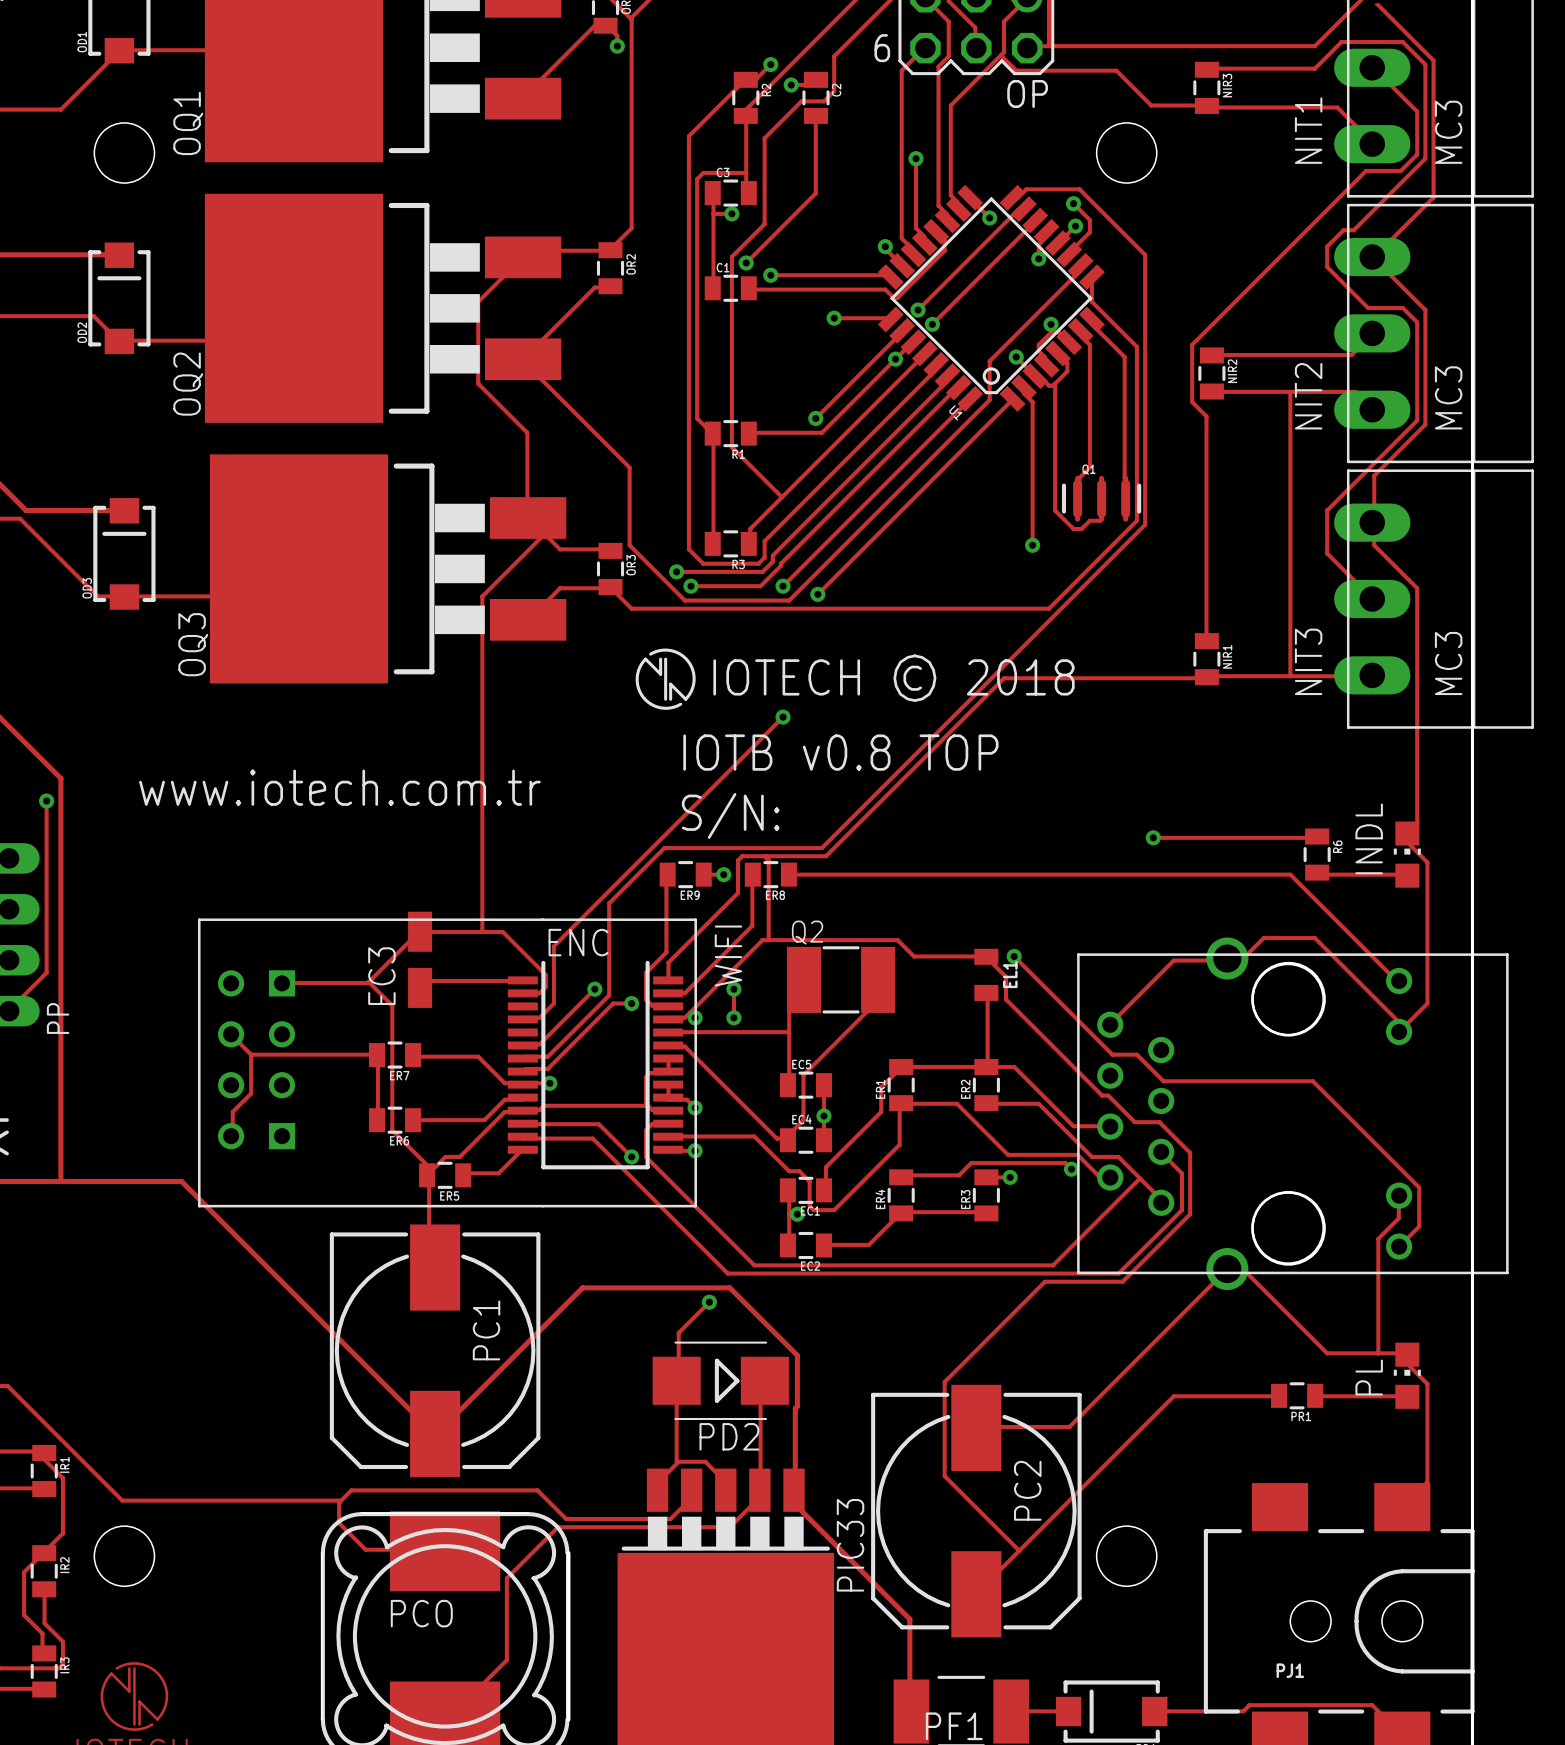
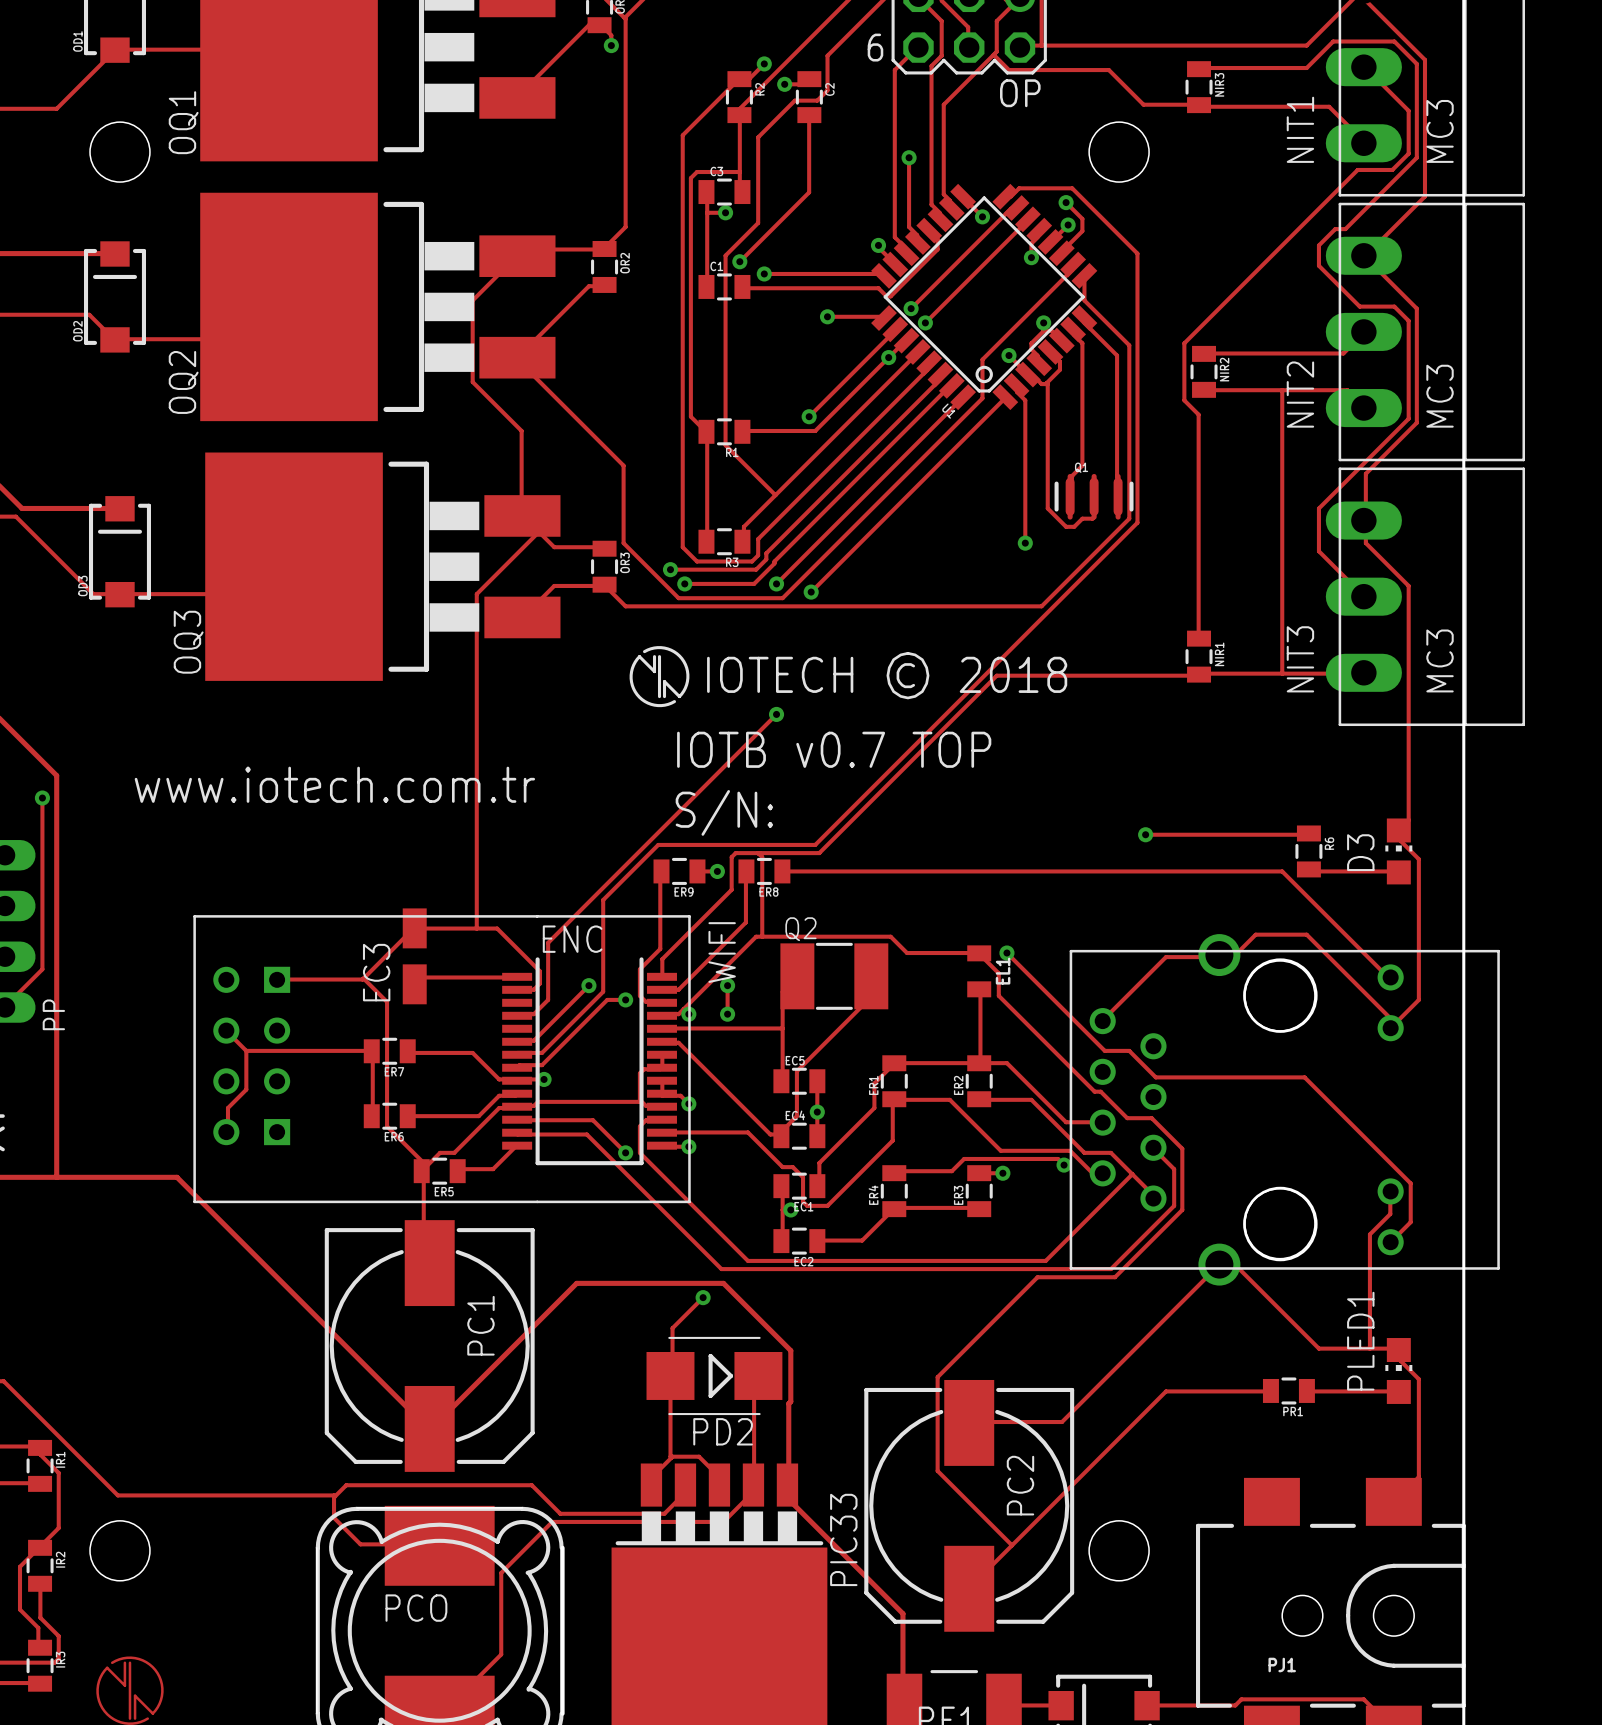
text: IOTB v0.8 TOP (840, 752) -> IOTB v0.7 TOP (834, 749)
INDL name: INDL (1369, 838) -> D3 (1360, 852)
PL name: PL (1369, 1377) -> PLED1 (1360, 1341)

